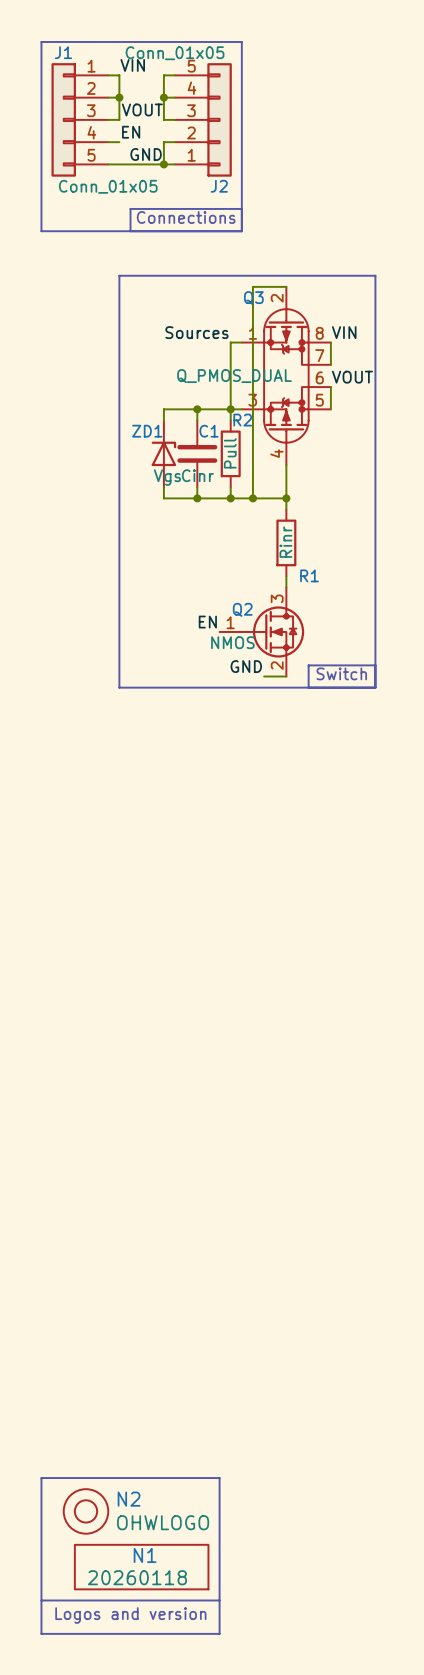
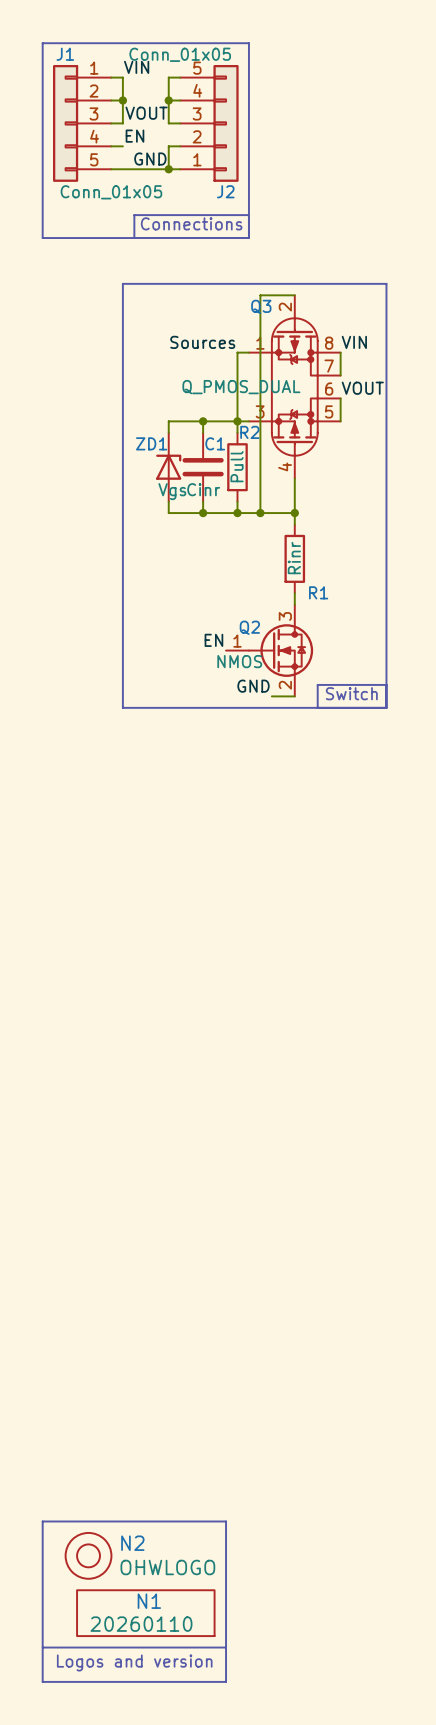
N1 value: 20260118 (137, 1577) -> 20260110 (141, 1624)

